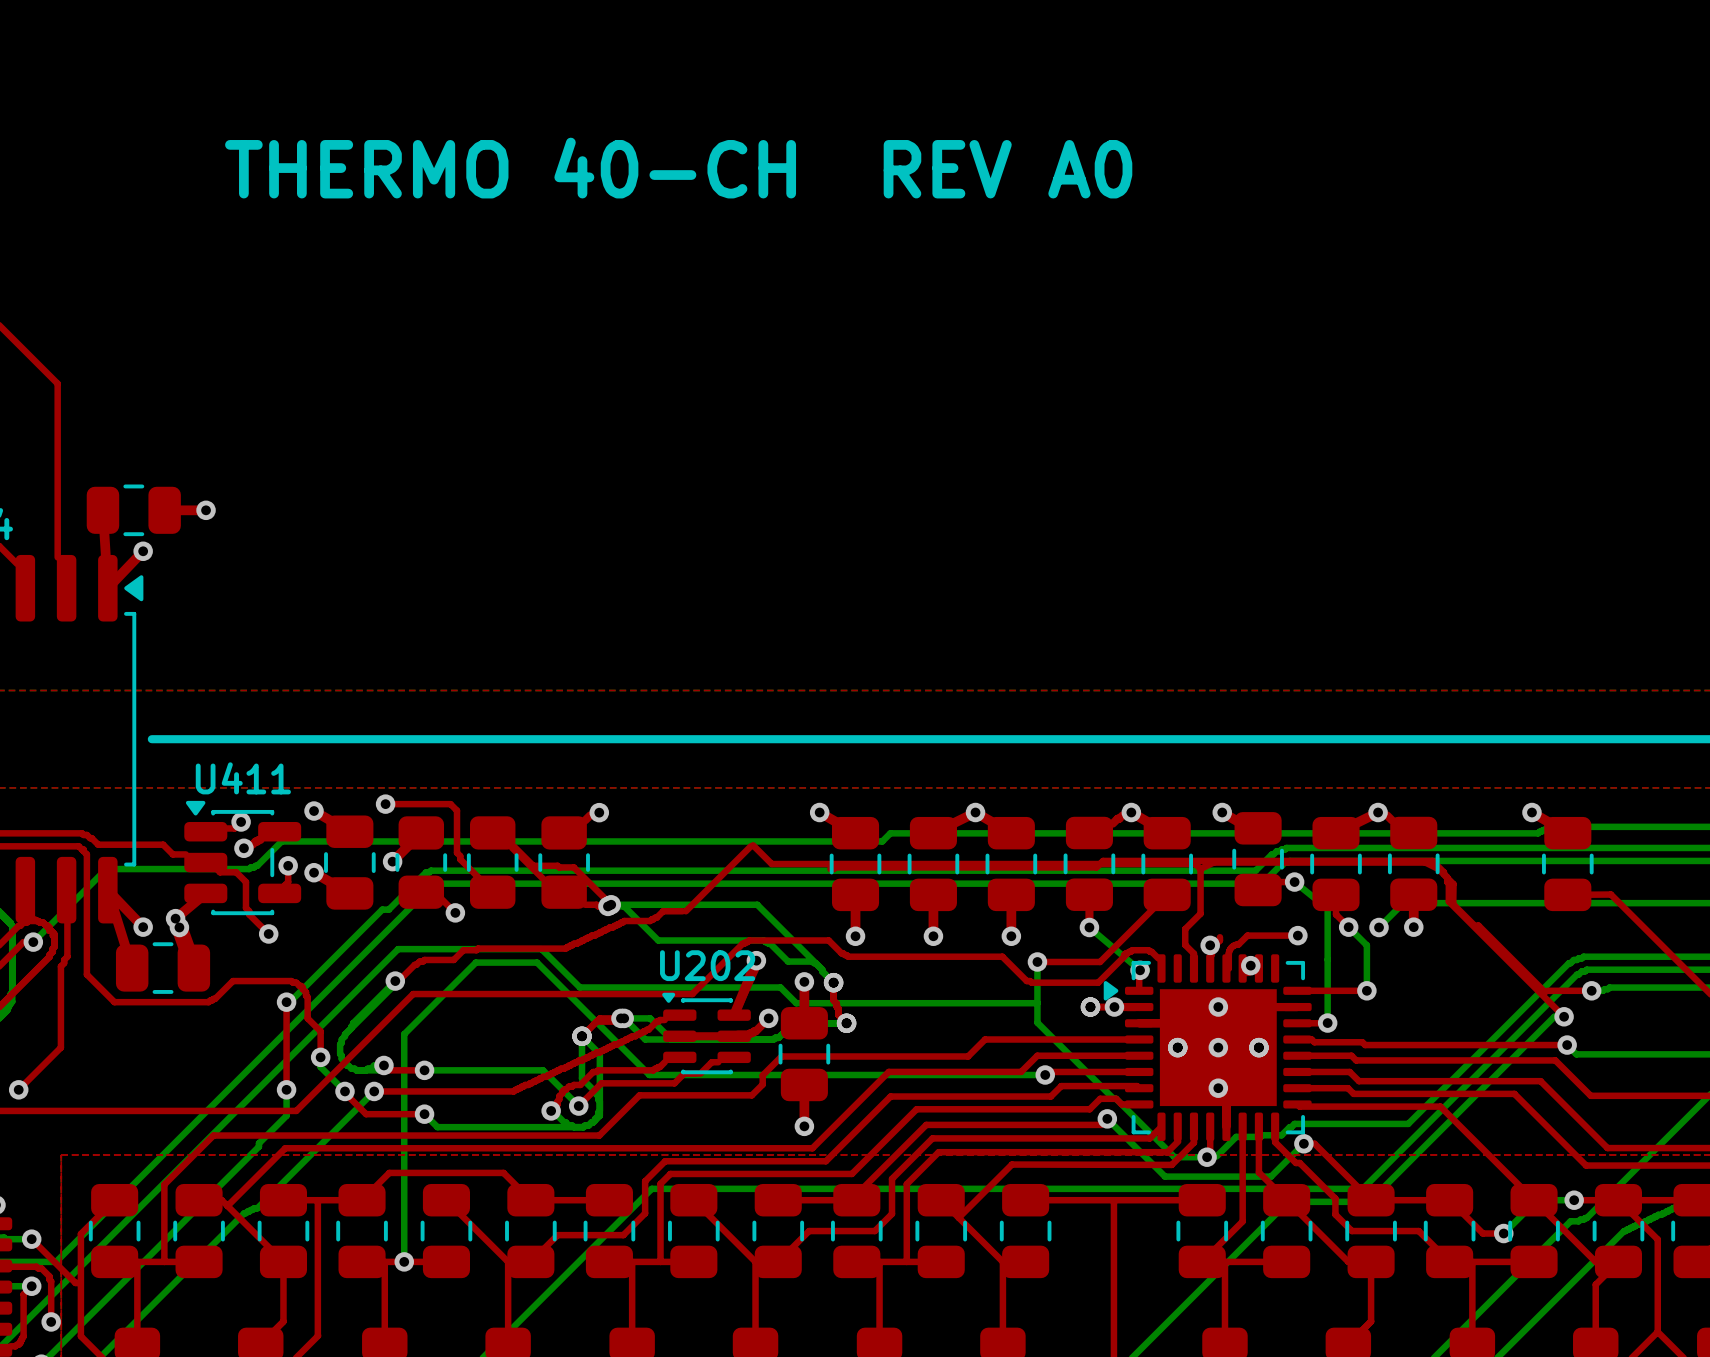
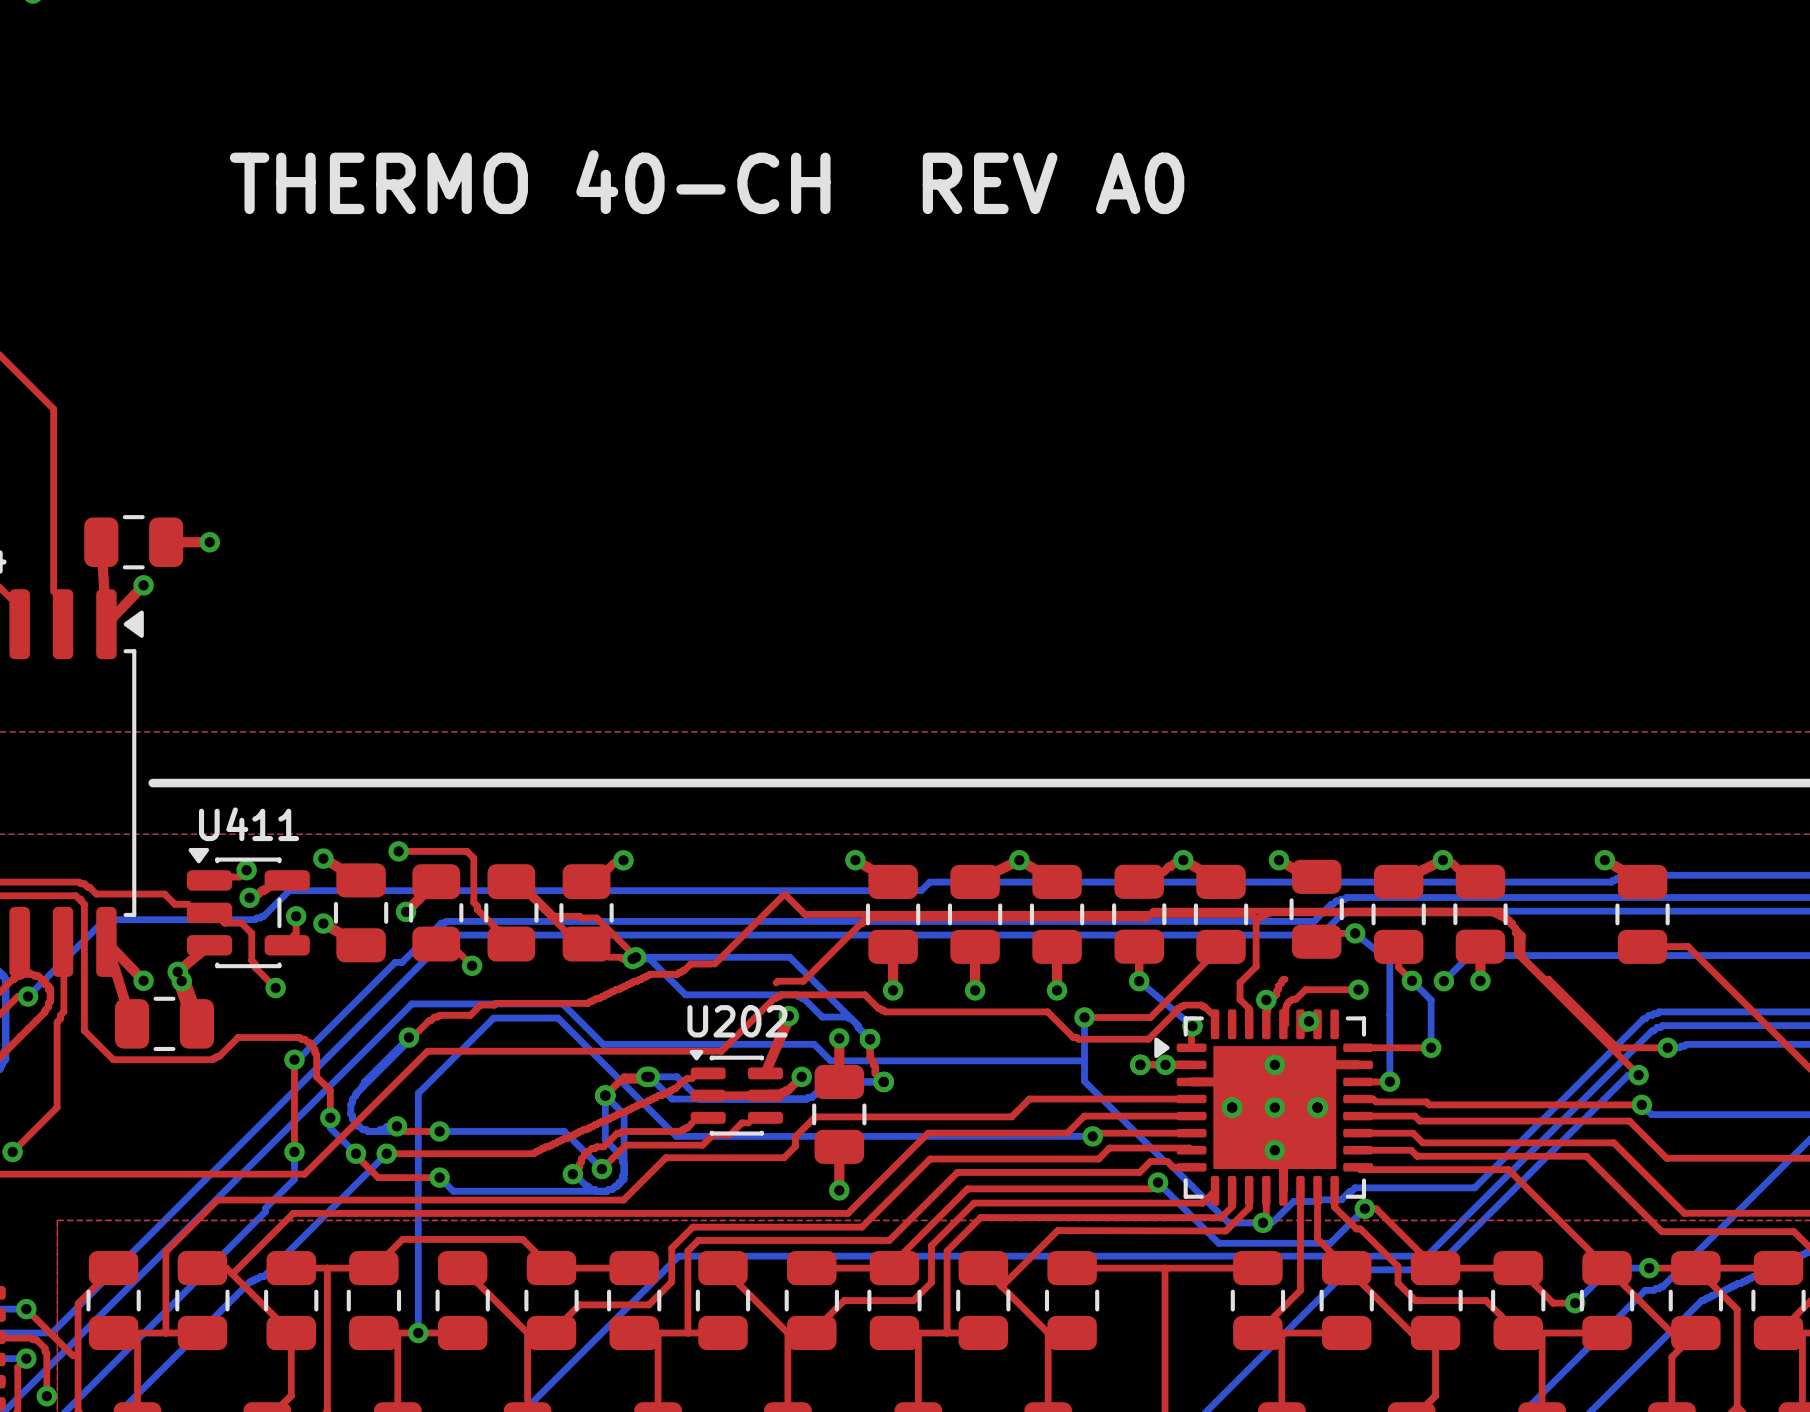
top track: none -> (866, 919) (803, 981) (777, 981) (776, 982)
top track: none -> (1285, 979) (1281, 981) (1276, 991)

